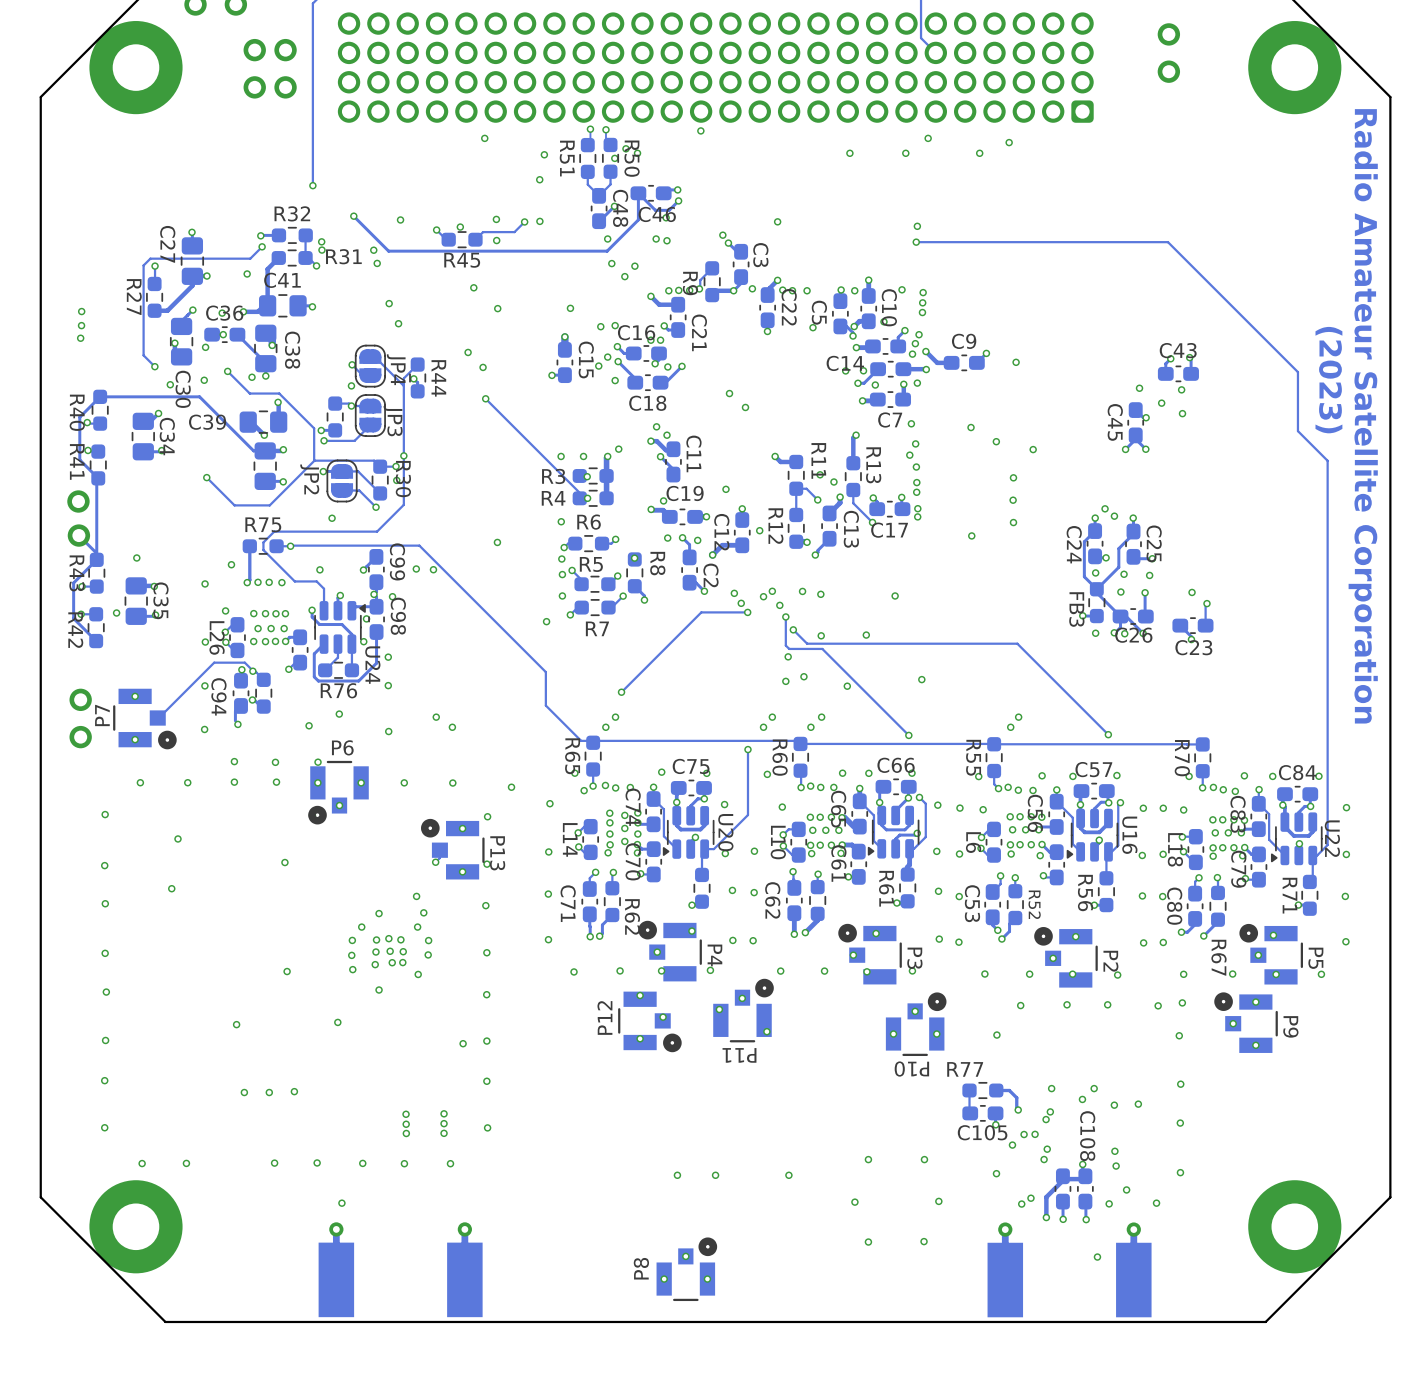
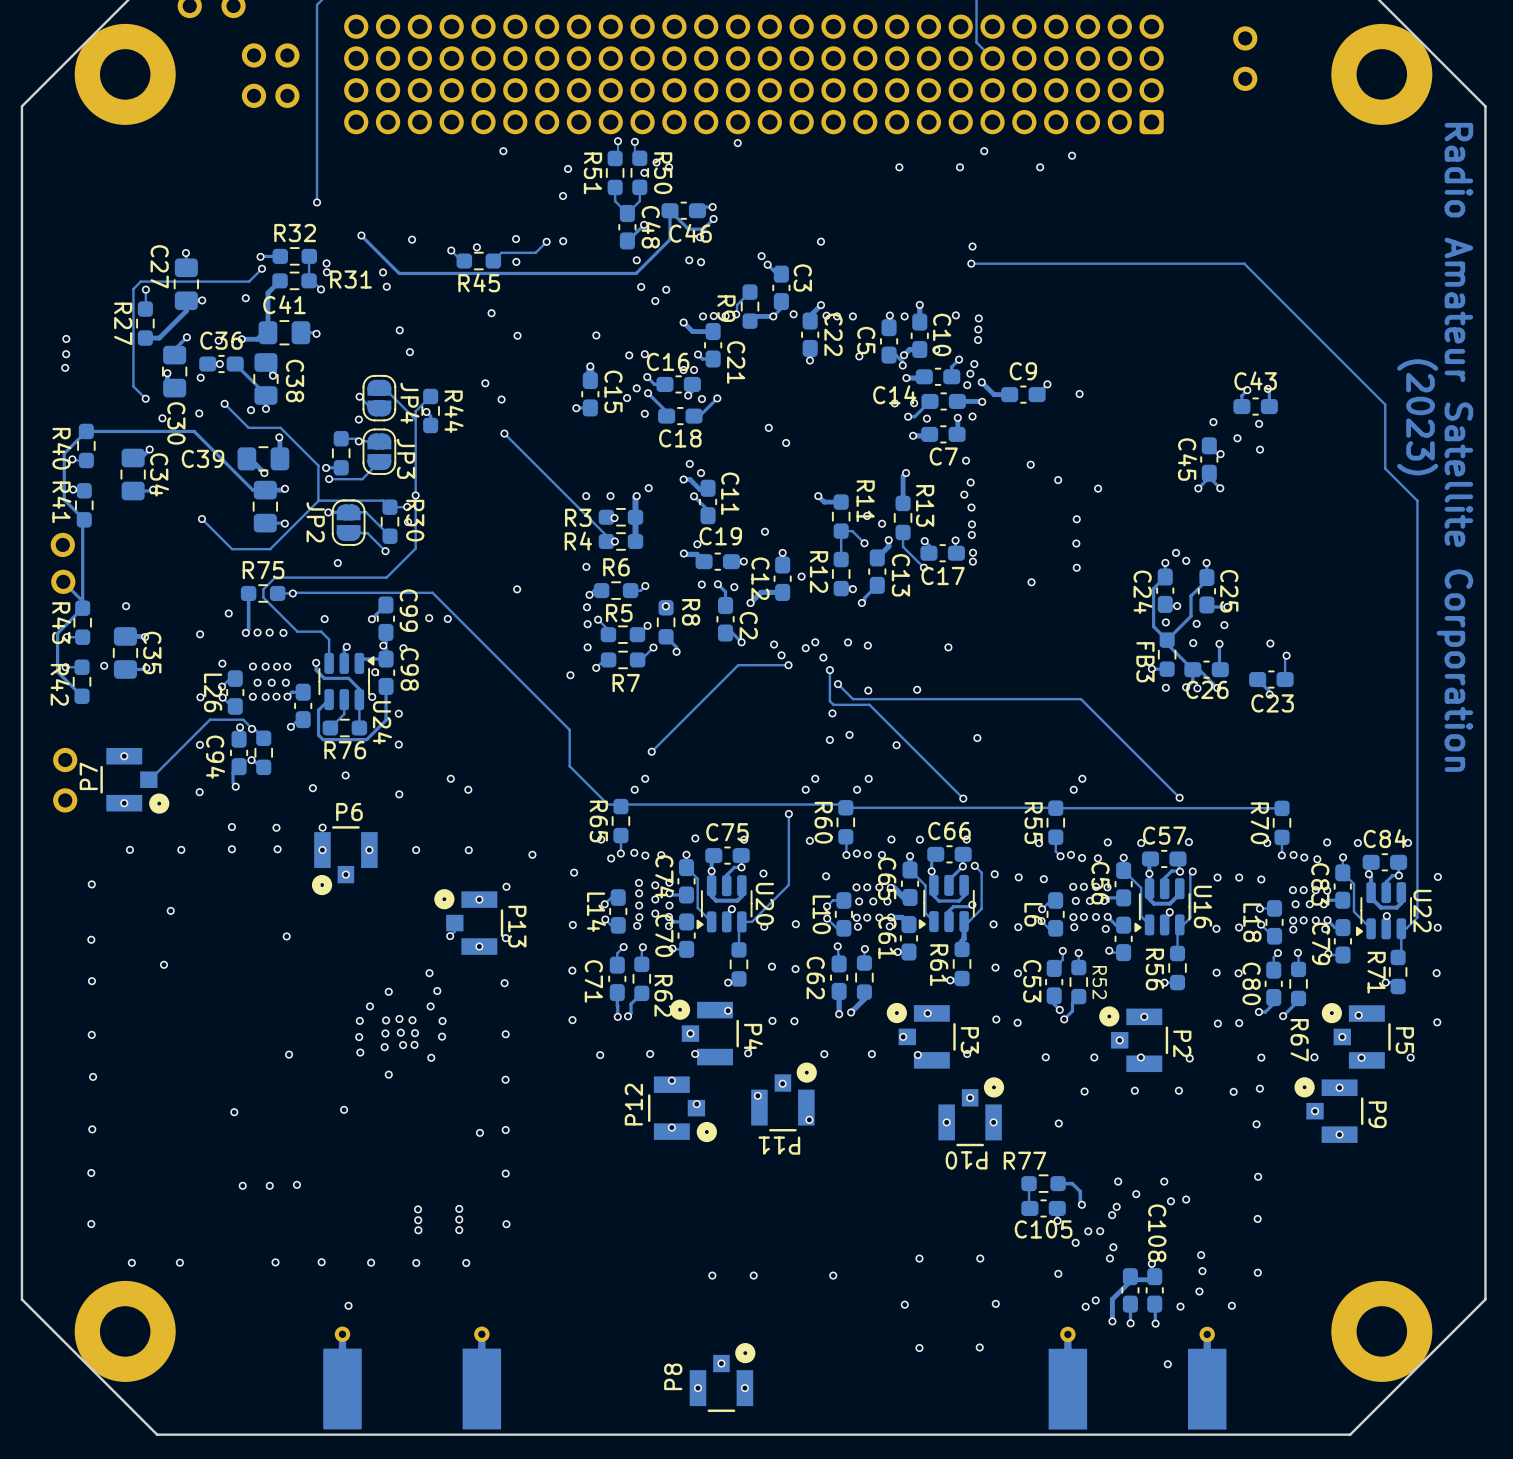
via: (1082, 1099) -> none
via: none -> (1136, 1194)
via: (1138, 1104) -> none
via: none -> (1170, 1201)
via: (1114, 1151) -> none
via: none -> (1201, 1255)
via: (1116, 1166) -> none
via: none -> (1202, 1271)

